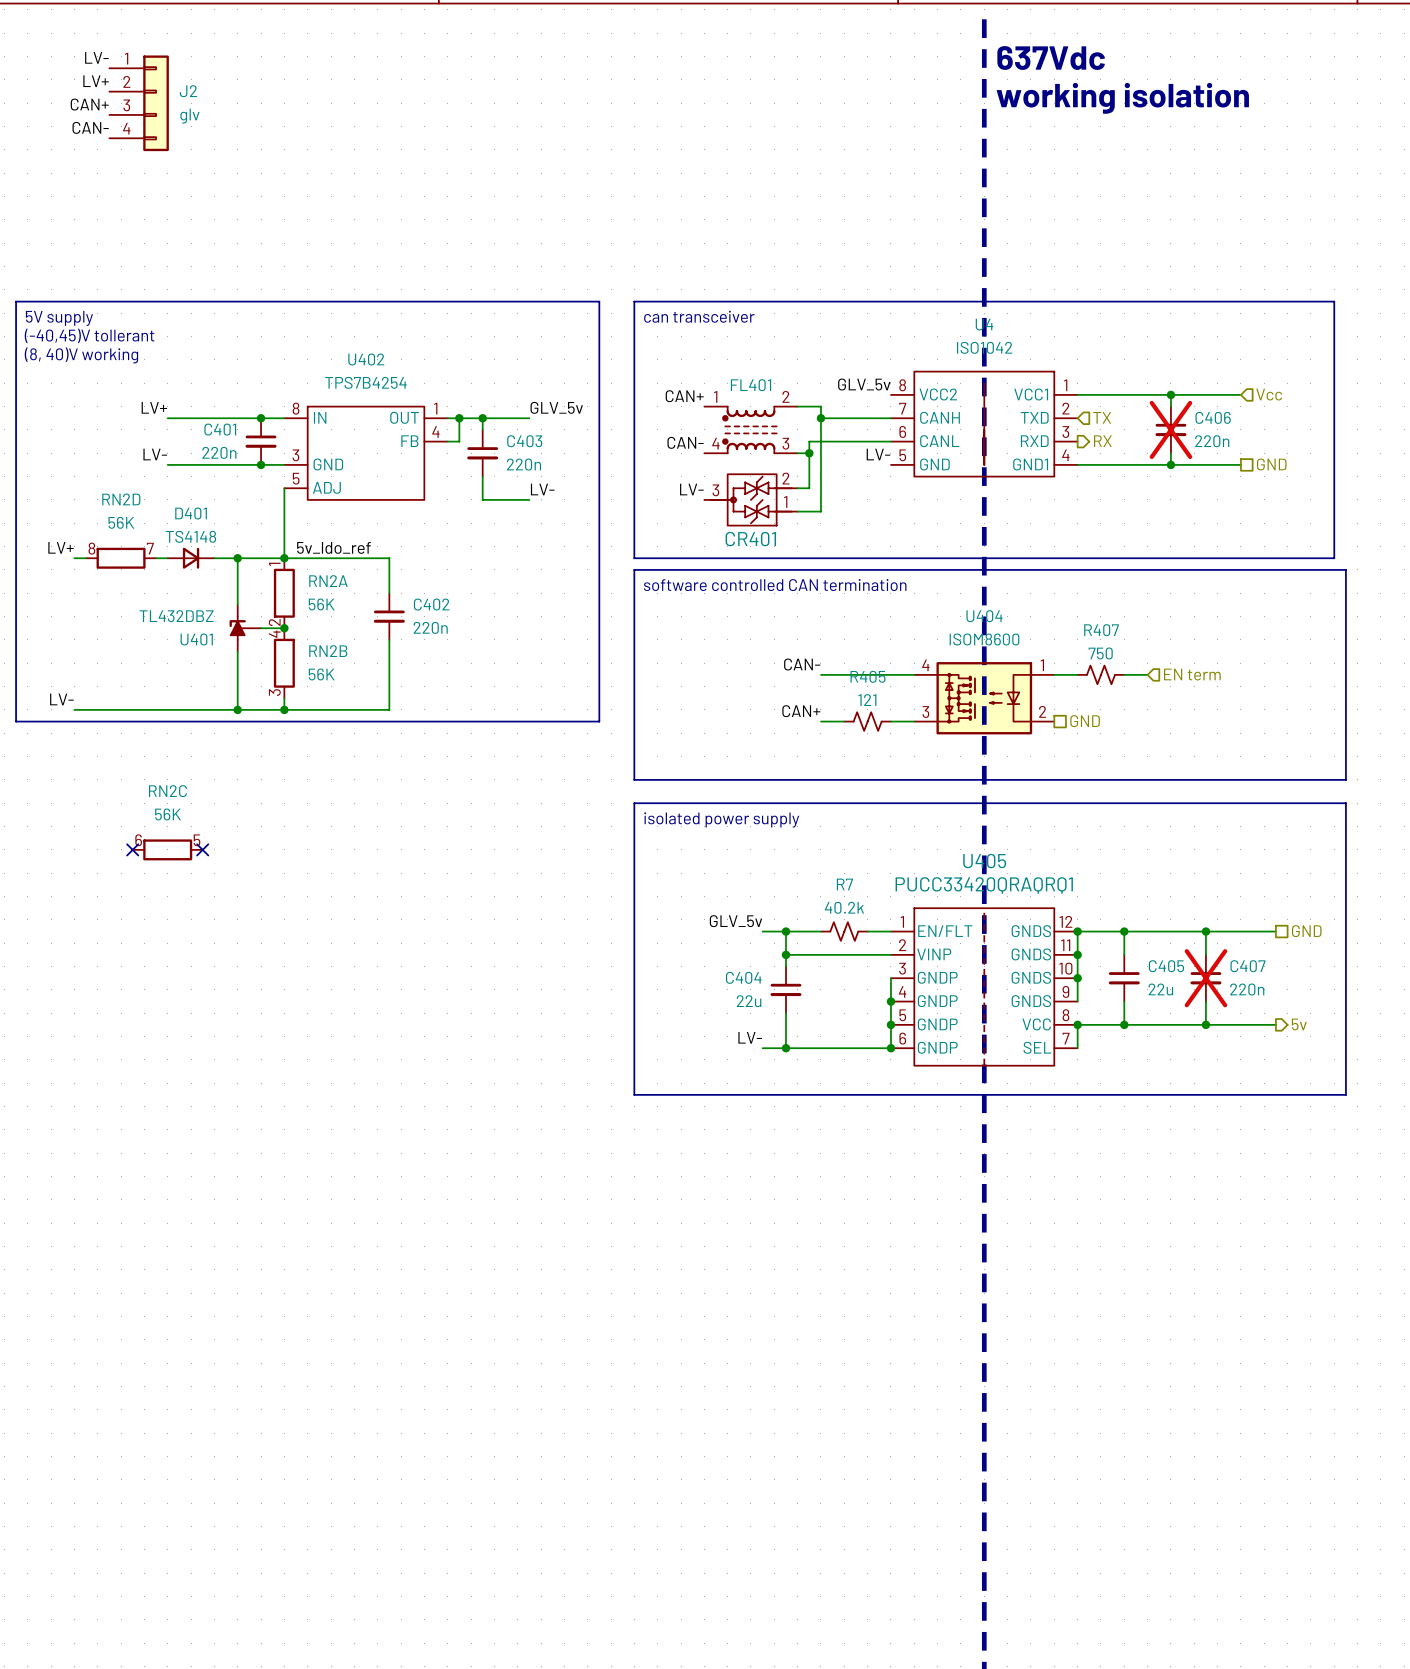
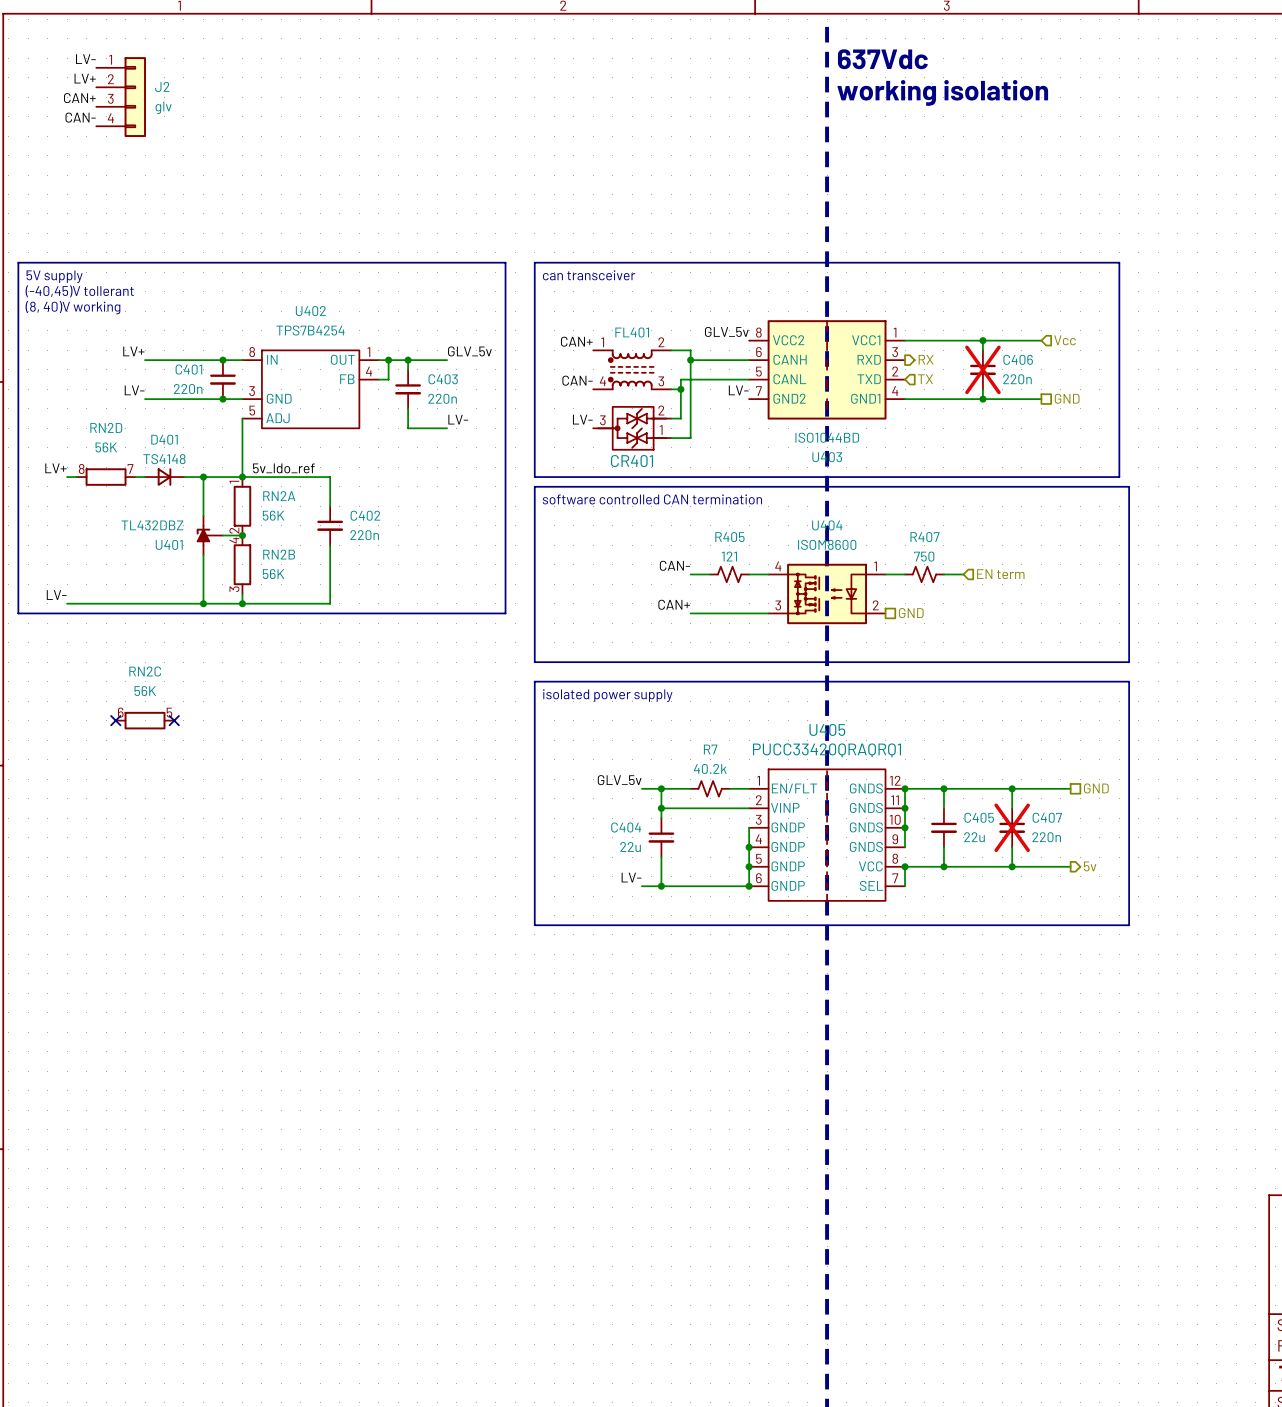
hierarchical label shape: input (1102, 417) -> output (926, 359)
hierarchical label: TX (1102, 417) -> RX (926, 359)
U4: ISO1042 (984, 424) -> none
U403: none -> ISO1044BD (827, 369)
hierarchical label shape: output (1102, 441) -> input (925, 379)
hierarchical label: RX (1102, 441) -> TX (925, 379)
R405 position: (867, 721) -> (729, 574)

